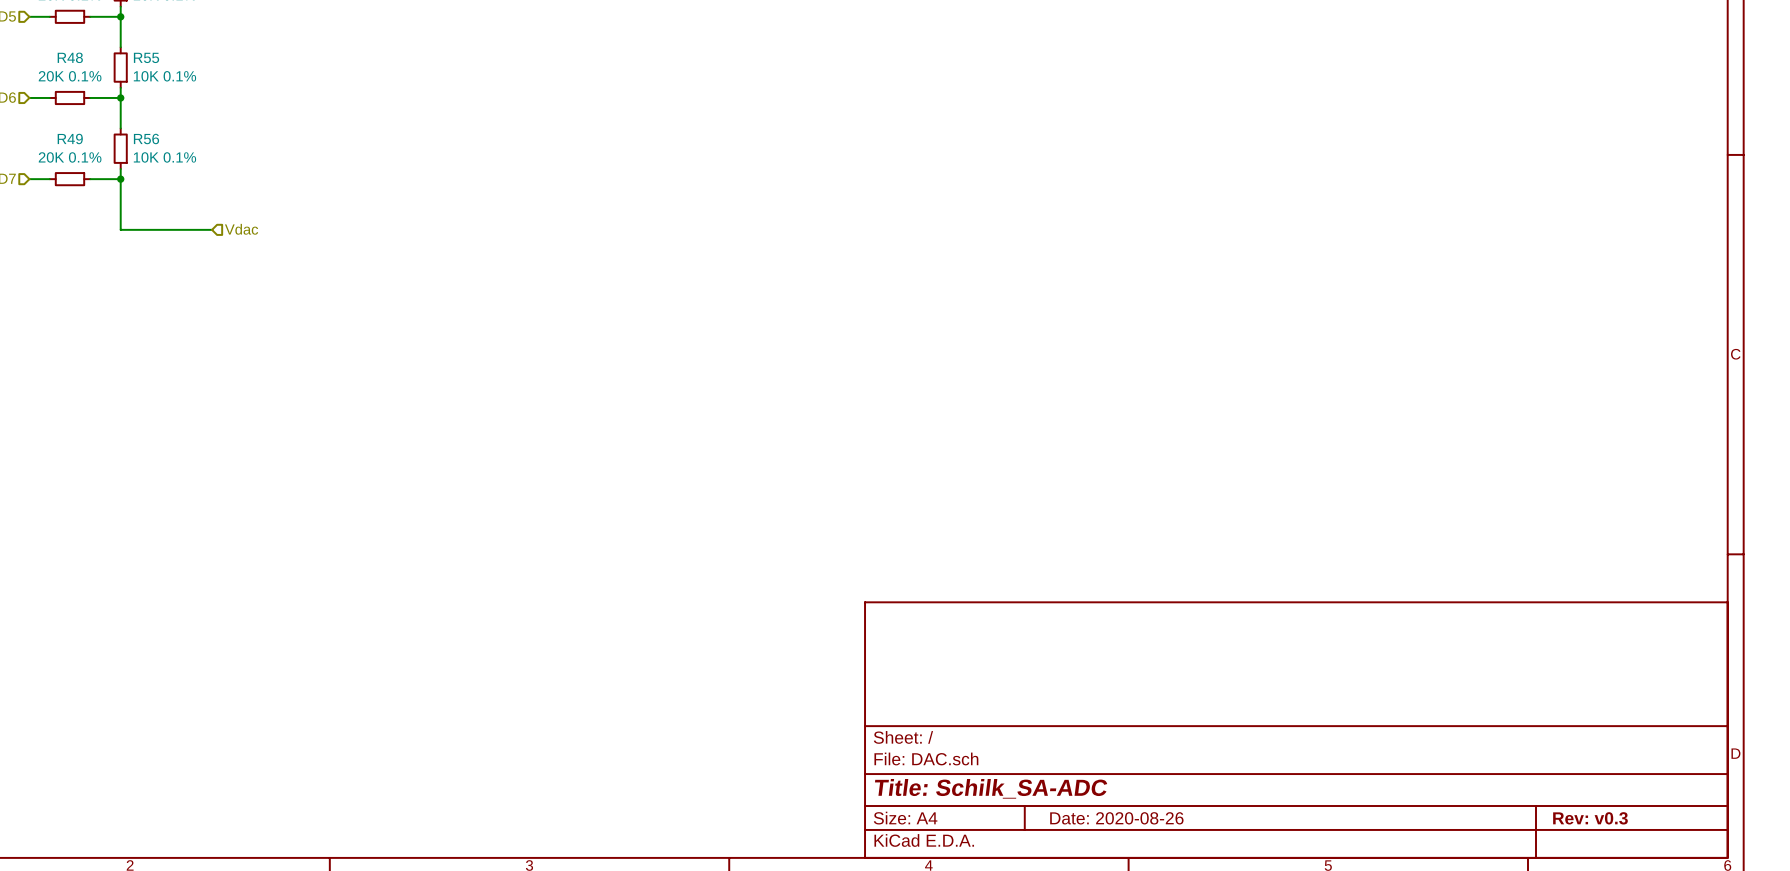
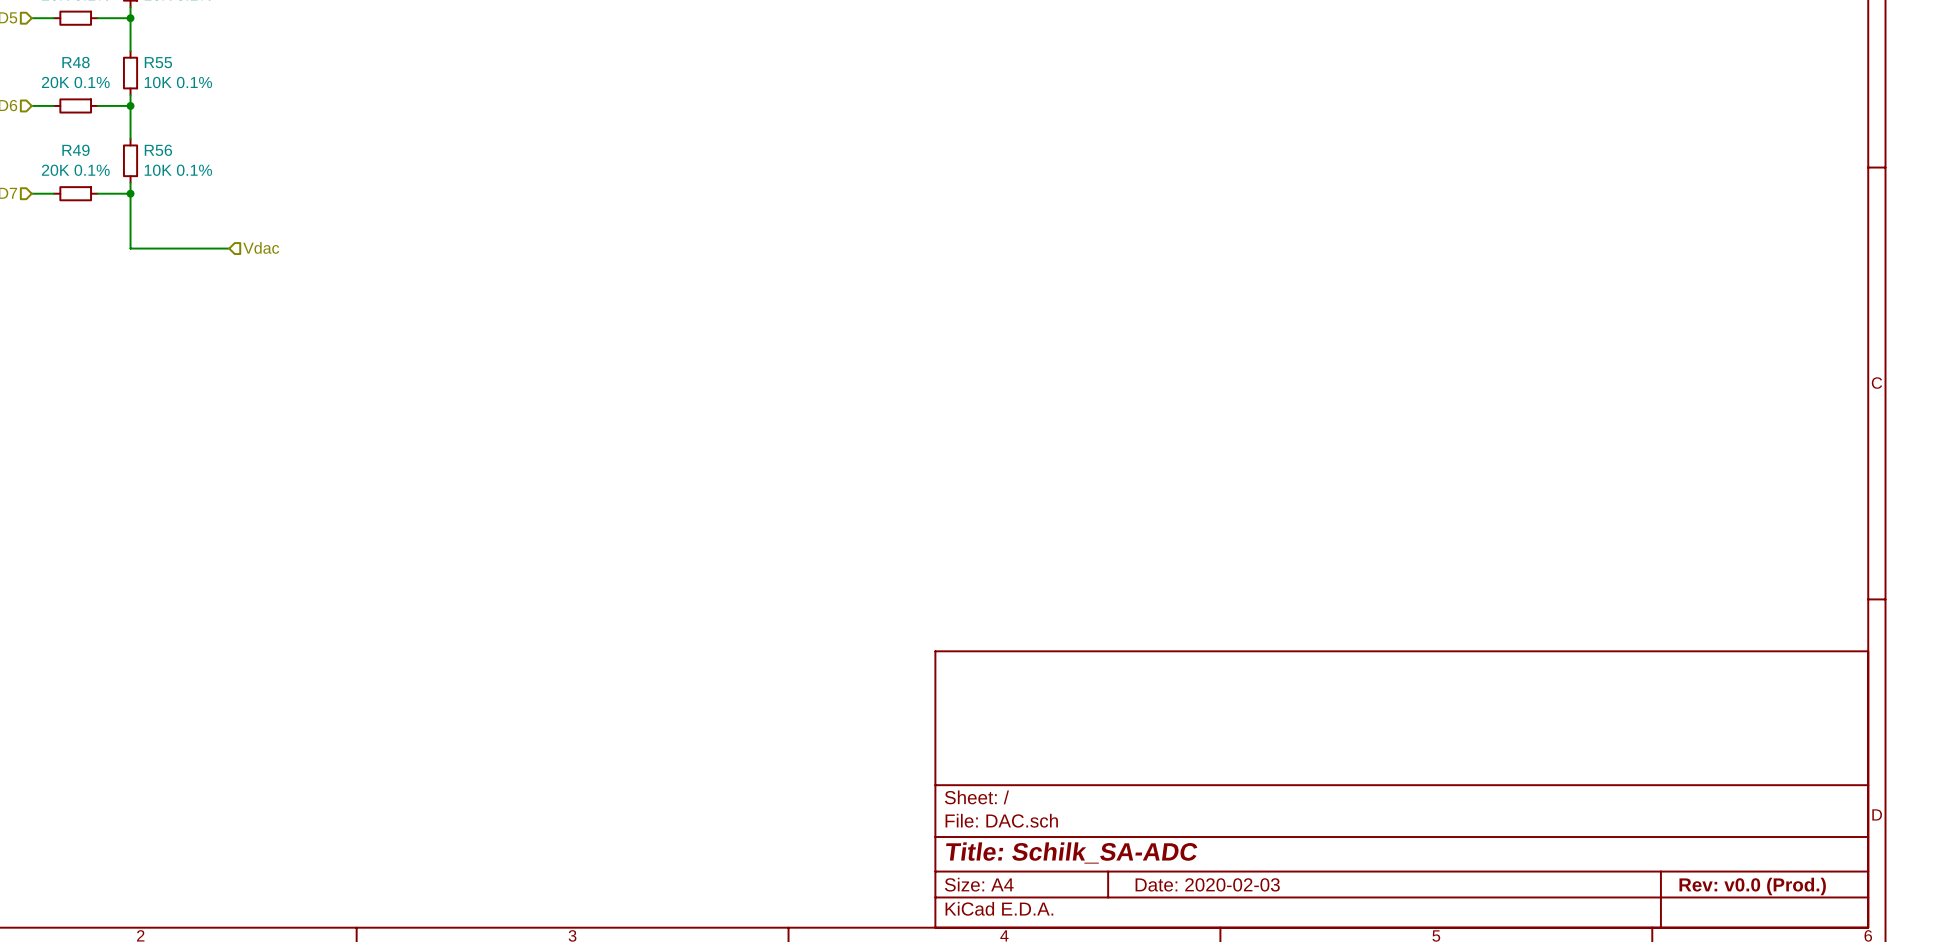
title block: Date: 2020-08-26 (1116, 818) -> Date: 2020-02-03 (1207, 884)
title block: Rev: v0.3 (1590, 818) -> Rev: v0.0 (Prod.) (1752, 886)

